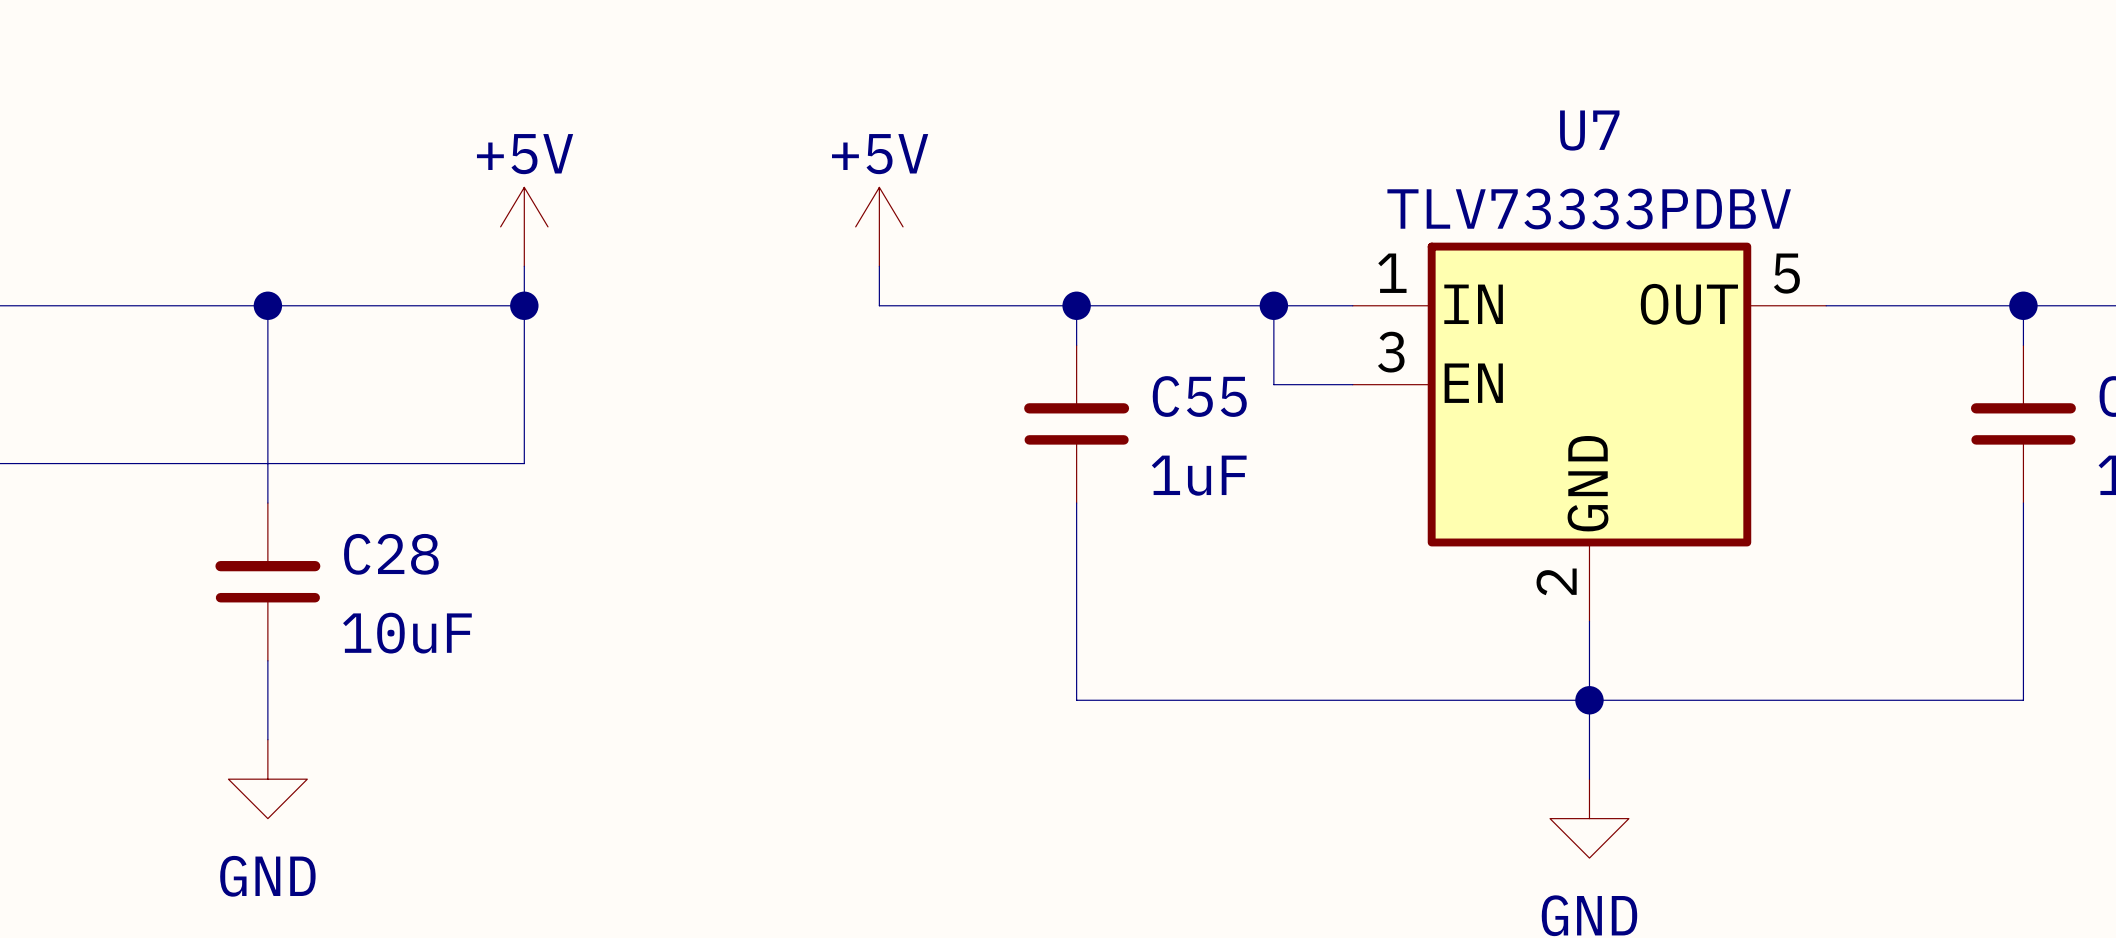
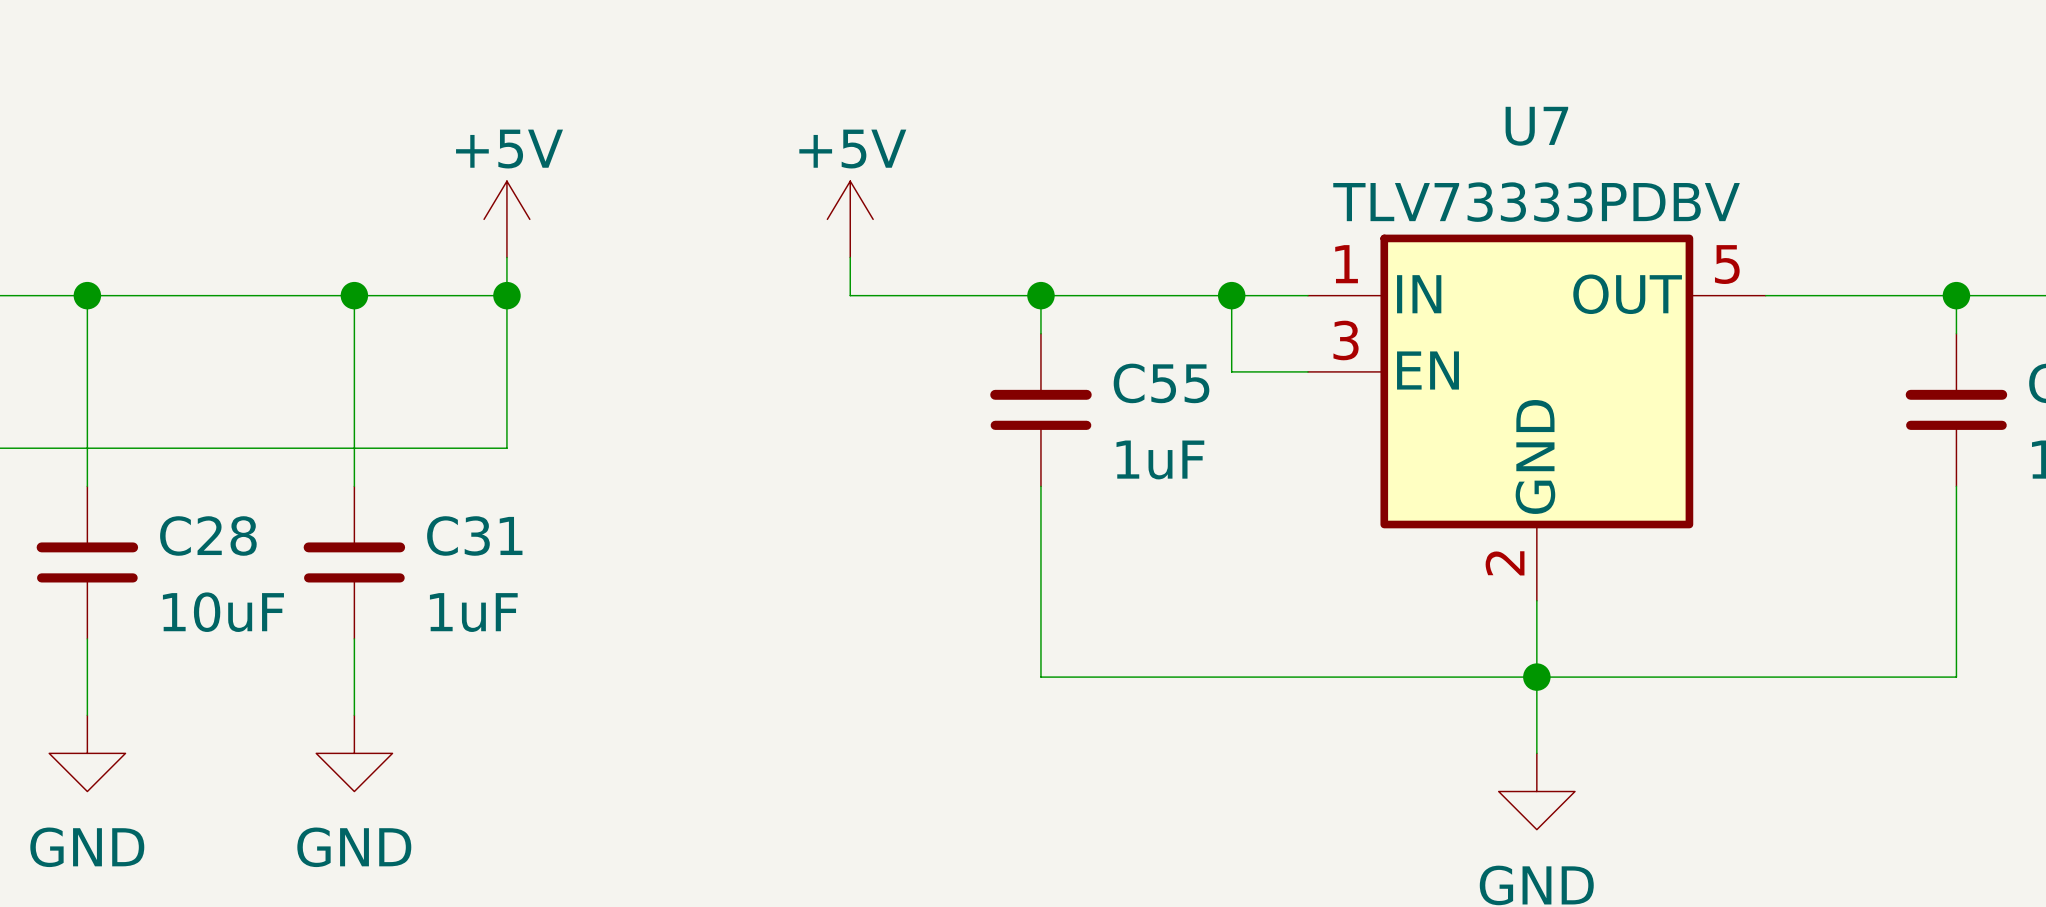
wire: none -> (87, 295) (87, 486)
junction: none -> (87, 295)
wire: (267, 305) (267, 503) -> (354, 295) (354, 486)
junction: (267, 305) -> none
junction: none -> (354, 295)
C28 position: (267, 581) -> (87, 562)
C31: none -> 1uF (354, 562)
wire: none -> (87, 638) (87, 715)
wire: (267, 660) (267, 739) -> (354, 638) (354, 715)
power symbol: none -> GND (87, 753)
power symbol: GND (267, 779) -> none
power symbol: none -> GND (354, 753)

